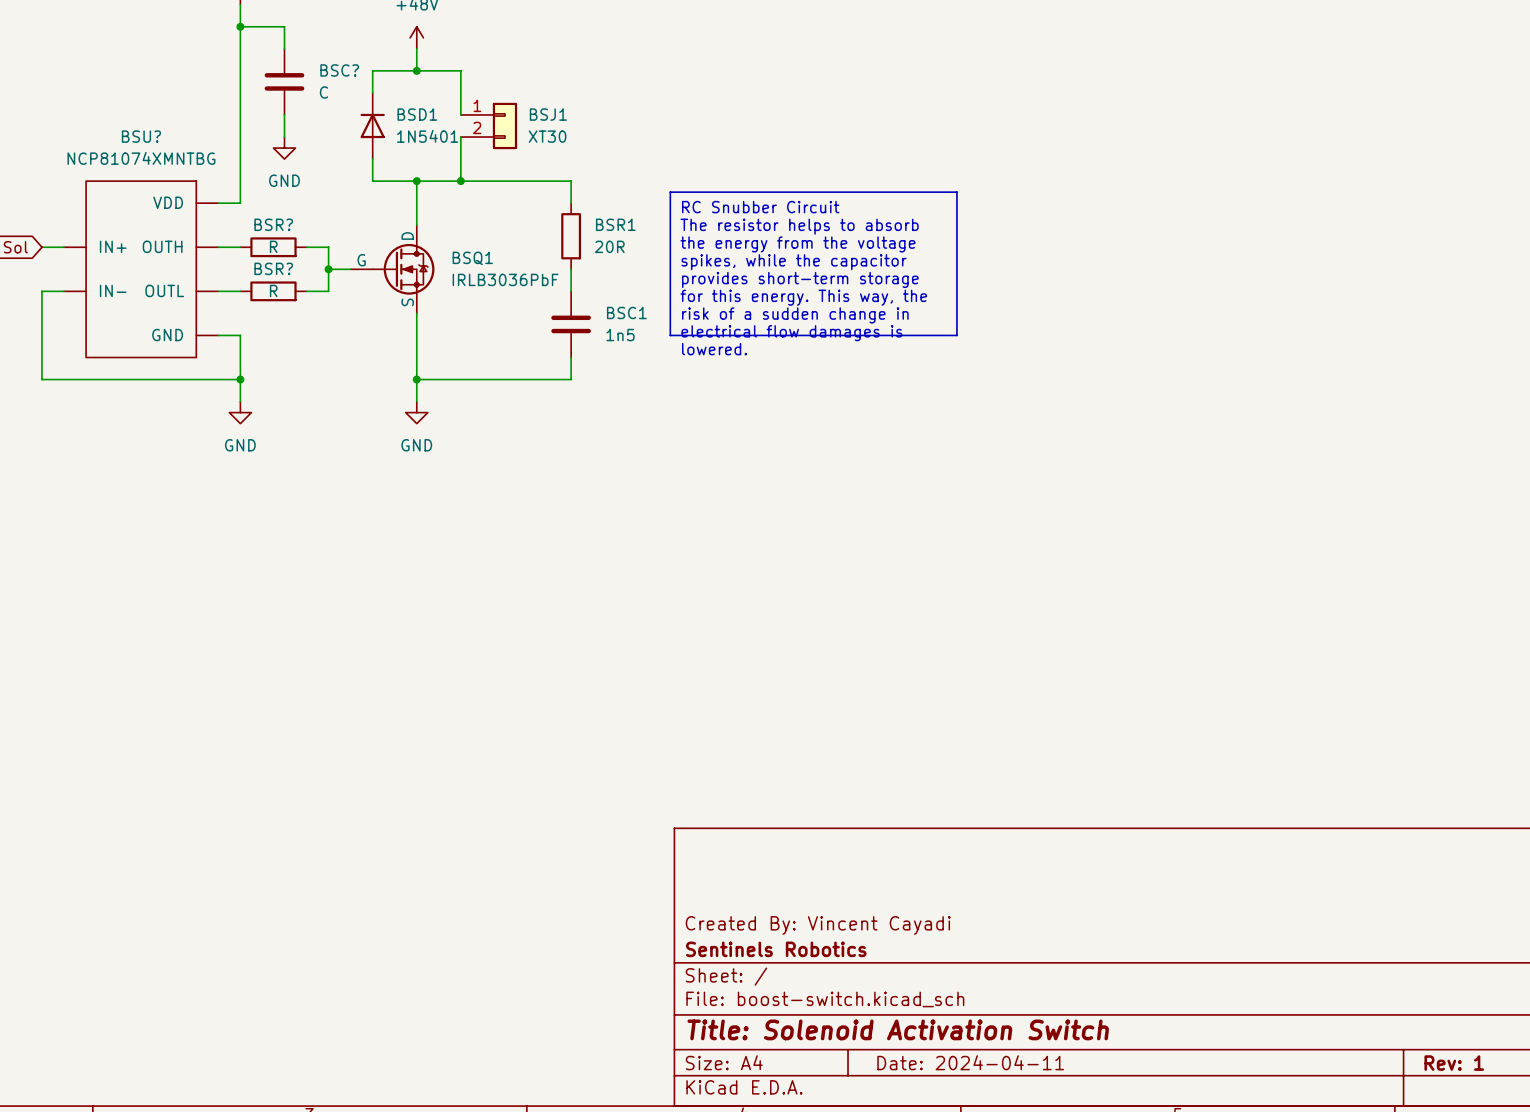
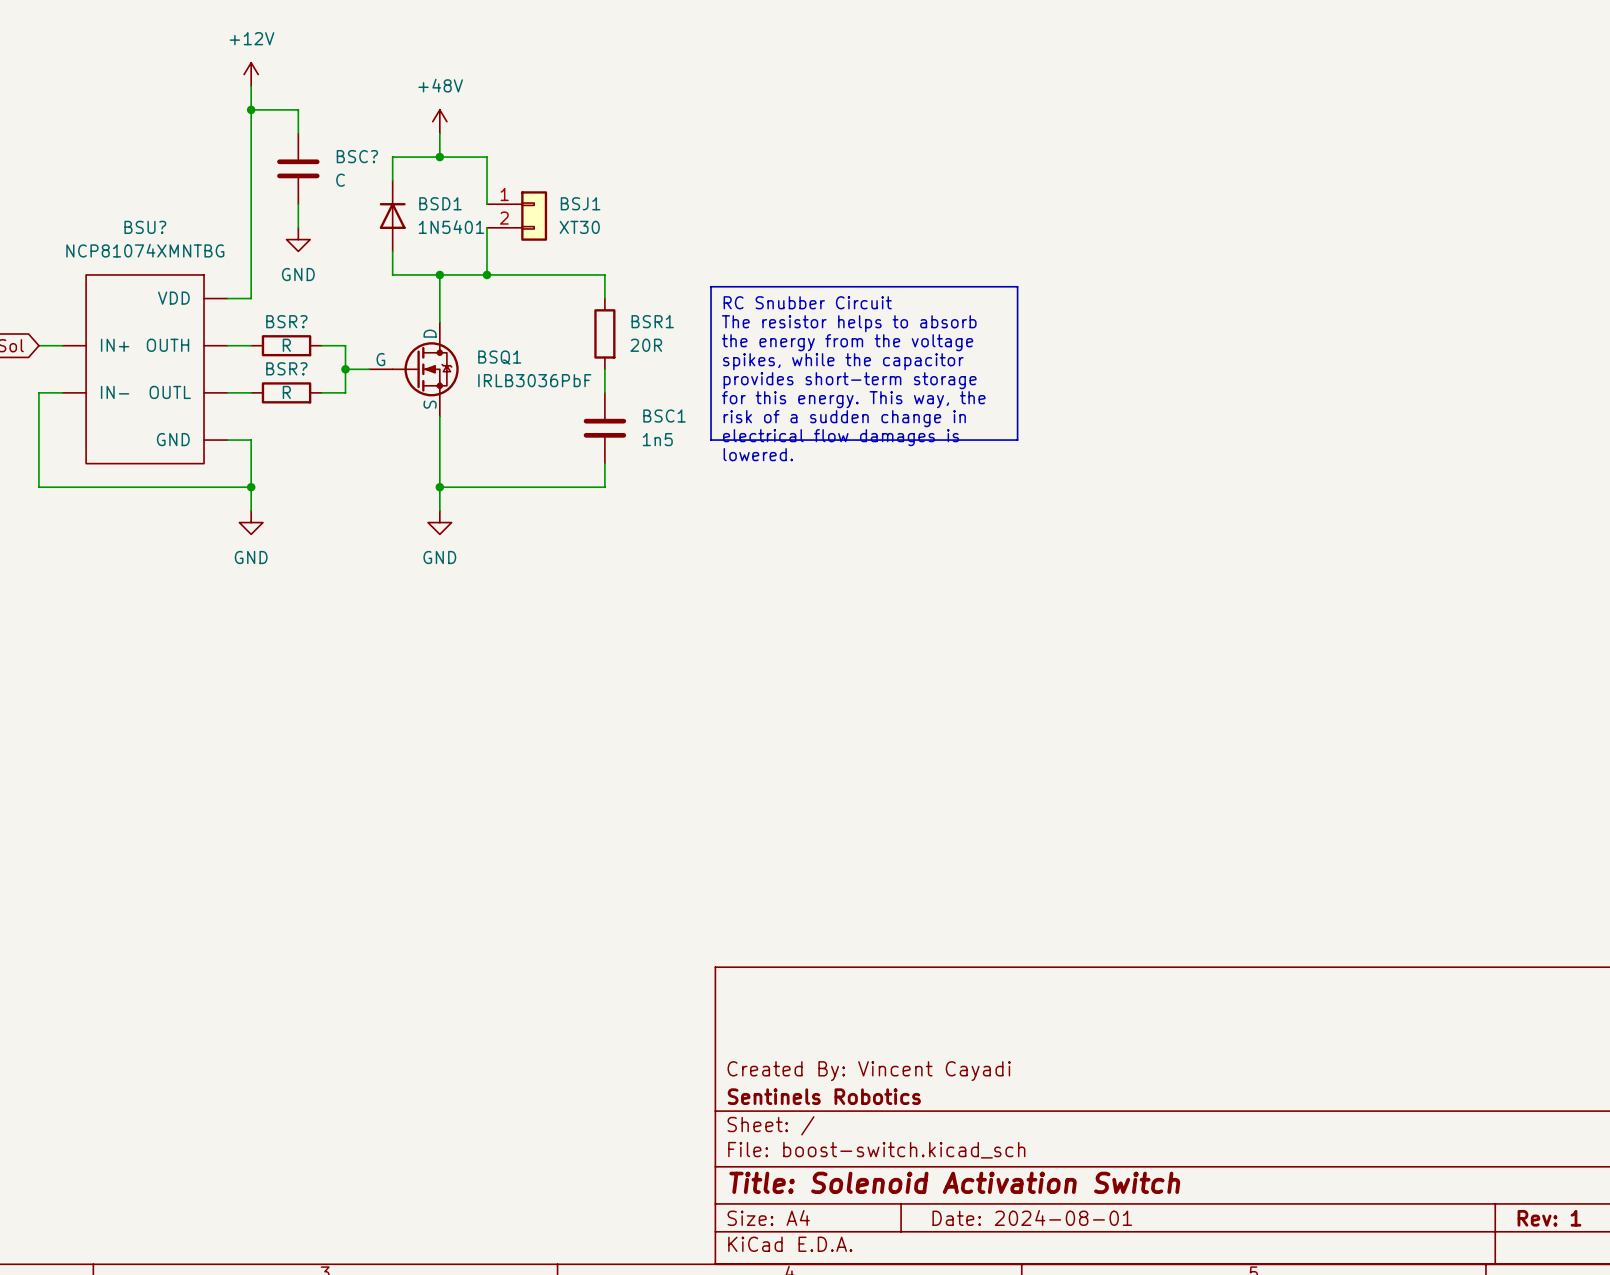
title block: Date: 2024-04-11 (970, 1062) -> Date: 2024-08-01 (1032, 1217)

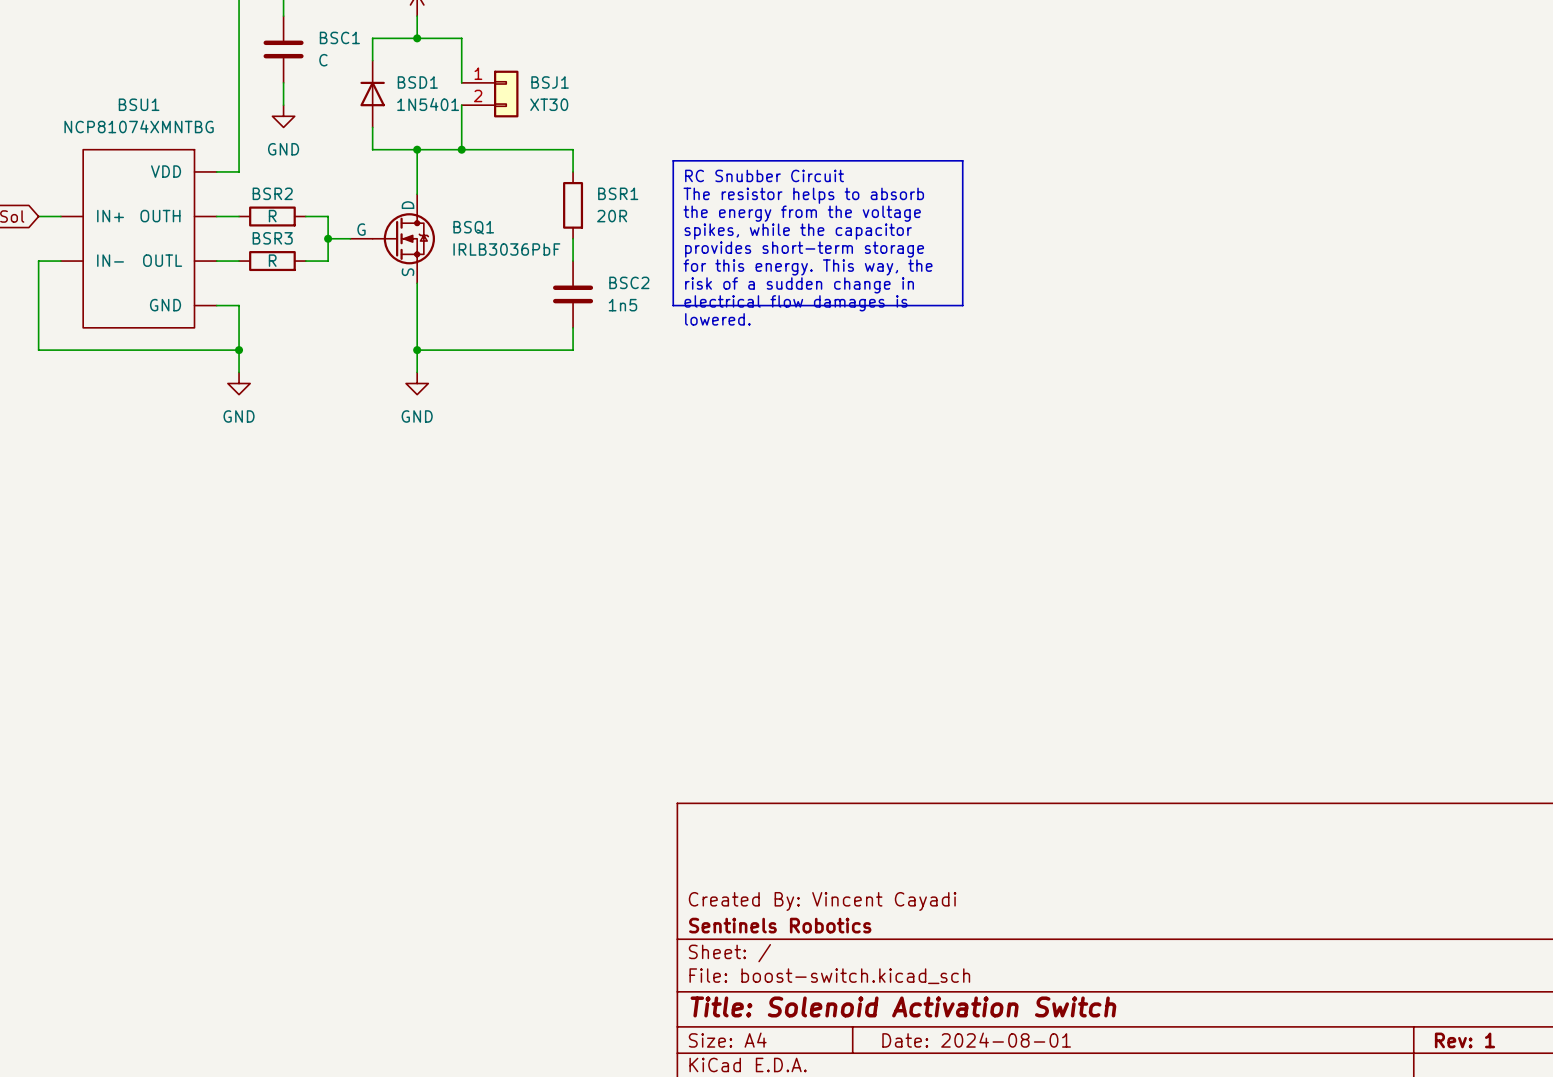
BSC? name: BSC? (357, 156) -> BSC1 (339, 37)
BSU? name: BSU? (145, 227) -> BSU1 (139, 104)
BSR? name: BSR? (286, 321) -> BSR2 (272, 193)
BSR? name: BSR? (286, 368) -> BSR3 (272, 238)
BSC1 name: BSC1 (664, 416) -> BSC2 (629, 282)

